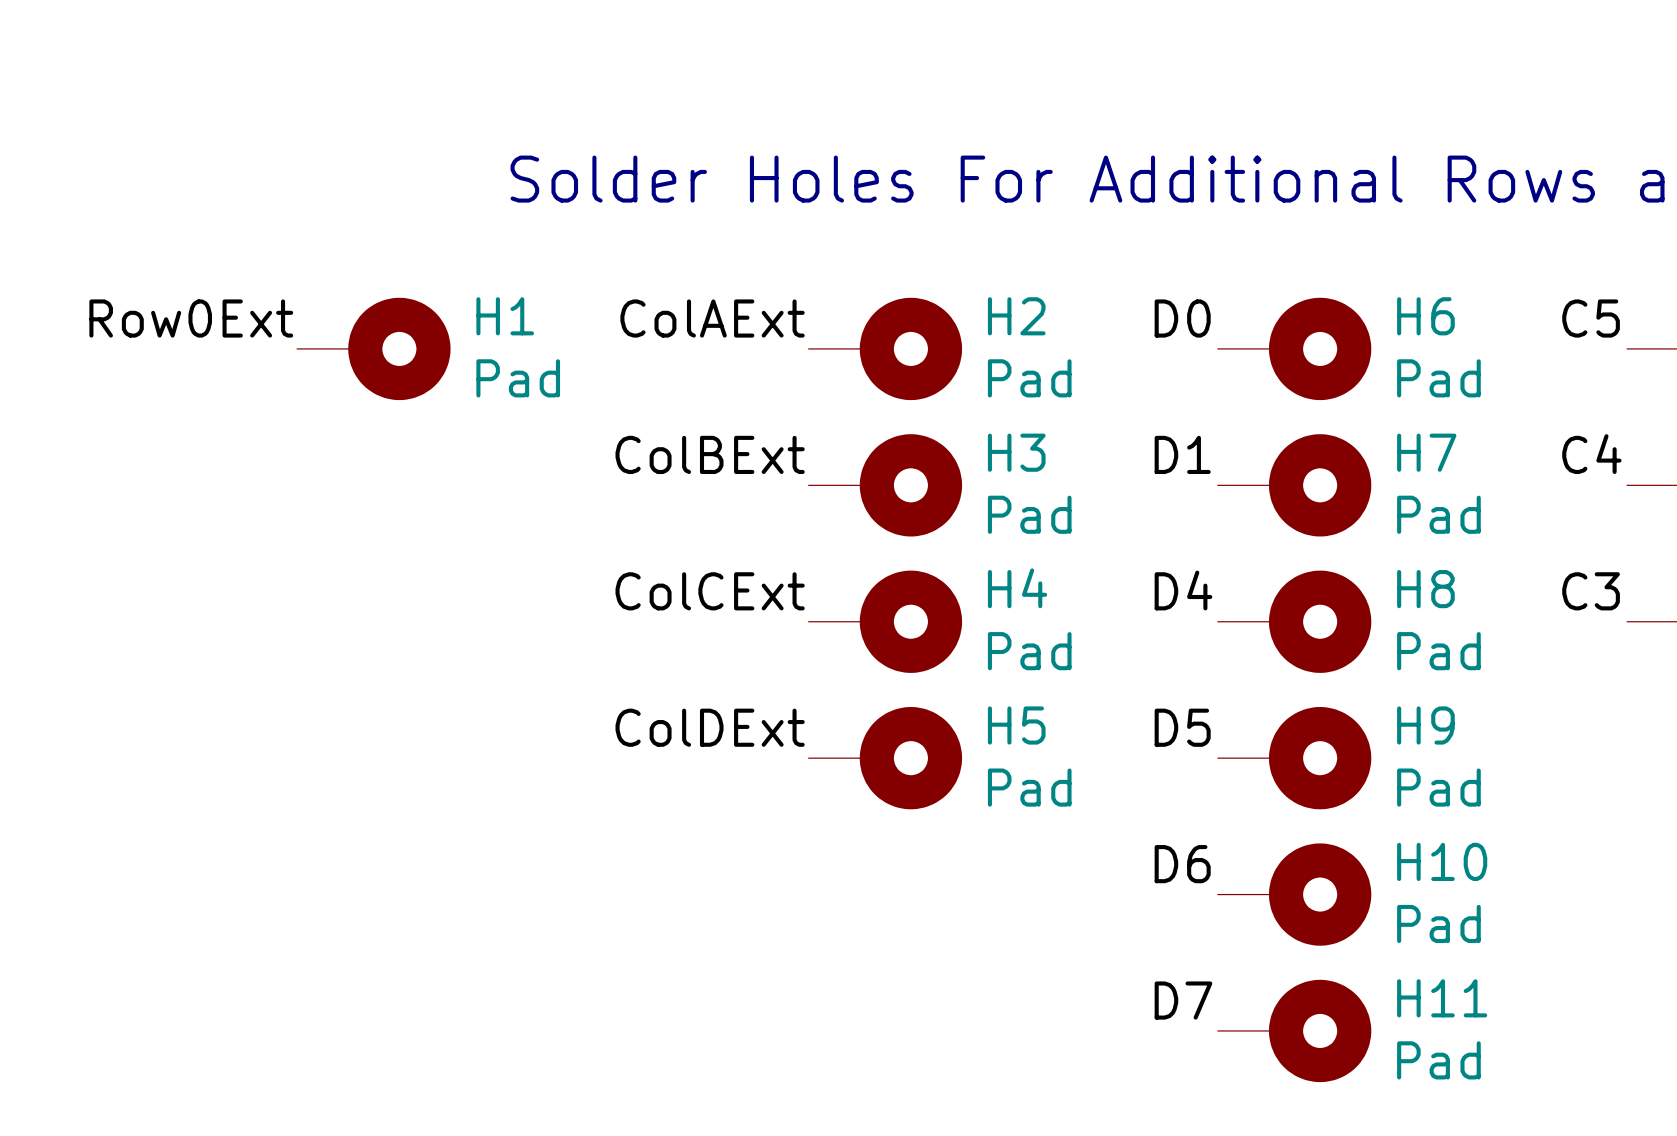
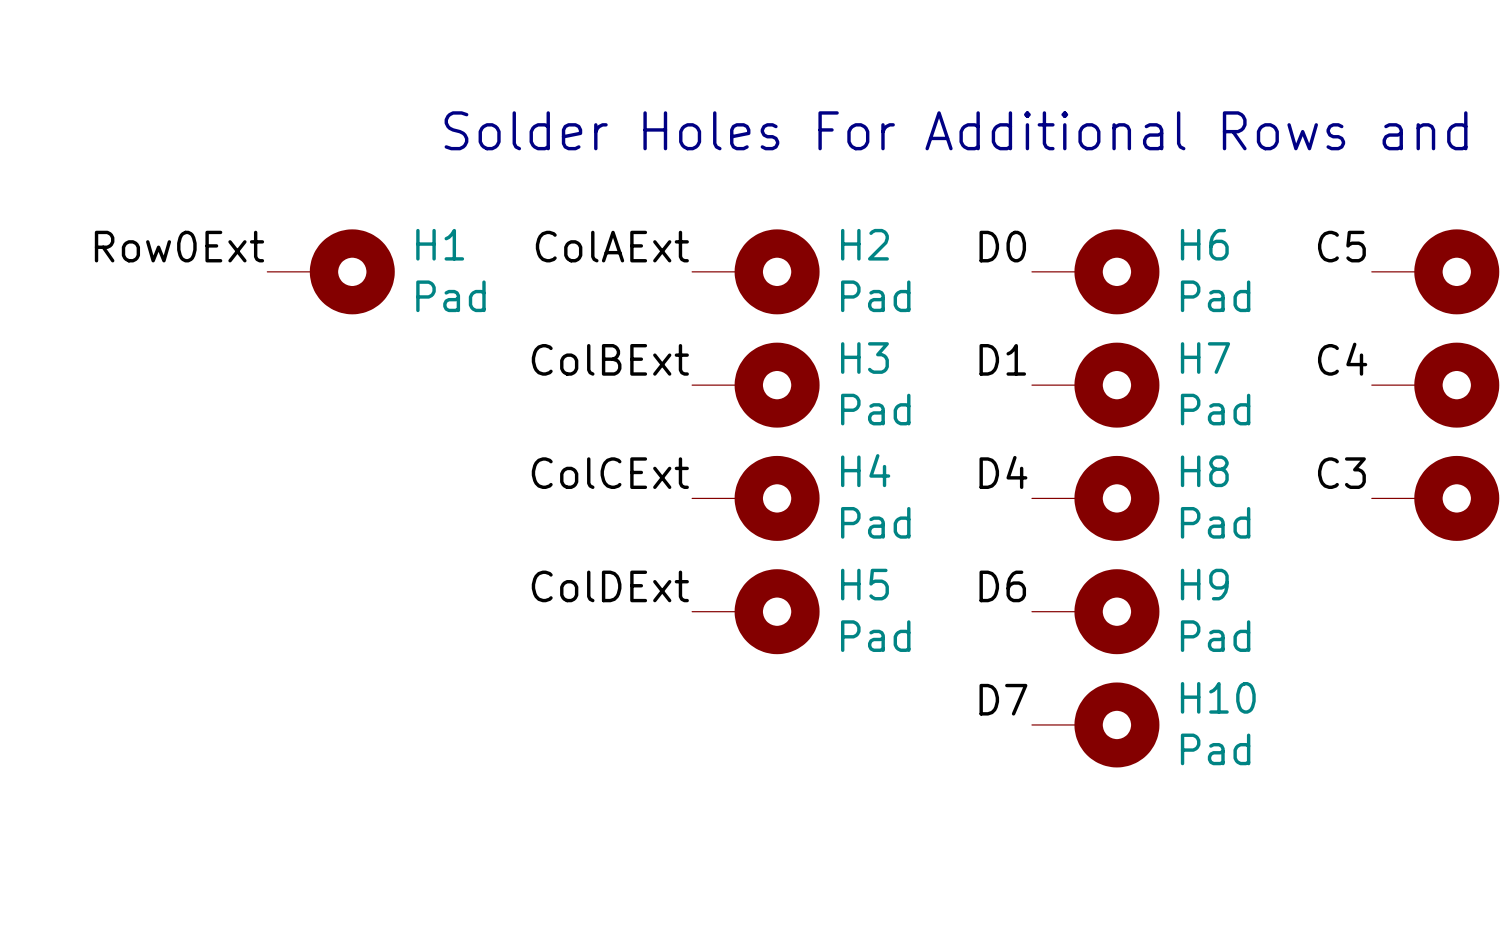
label: D5 (1182, 727) -> D6 (1002, 586)
label: D6 (1182, 864) -> D7 (1003, 699)
label: D7 (1183, 1000) -> none
H11: Pad (1294, 1030) -> none

